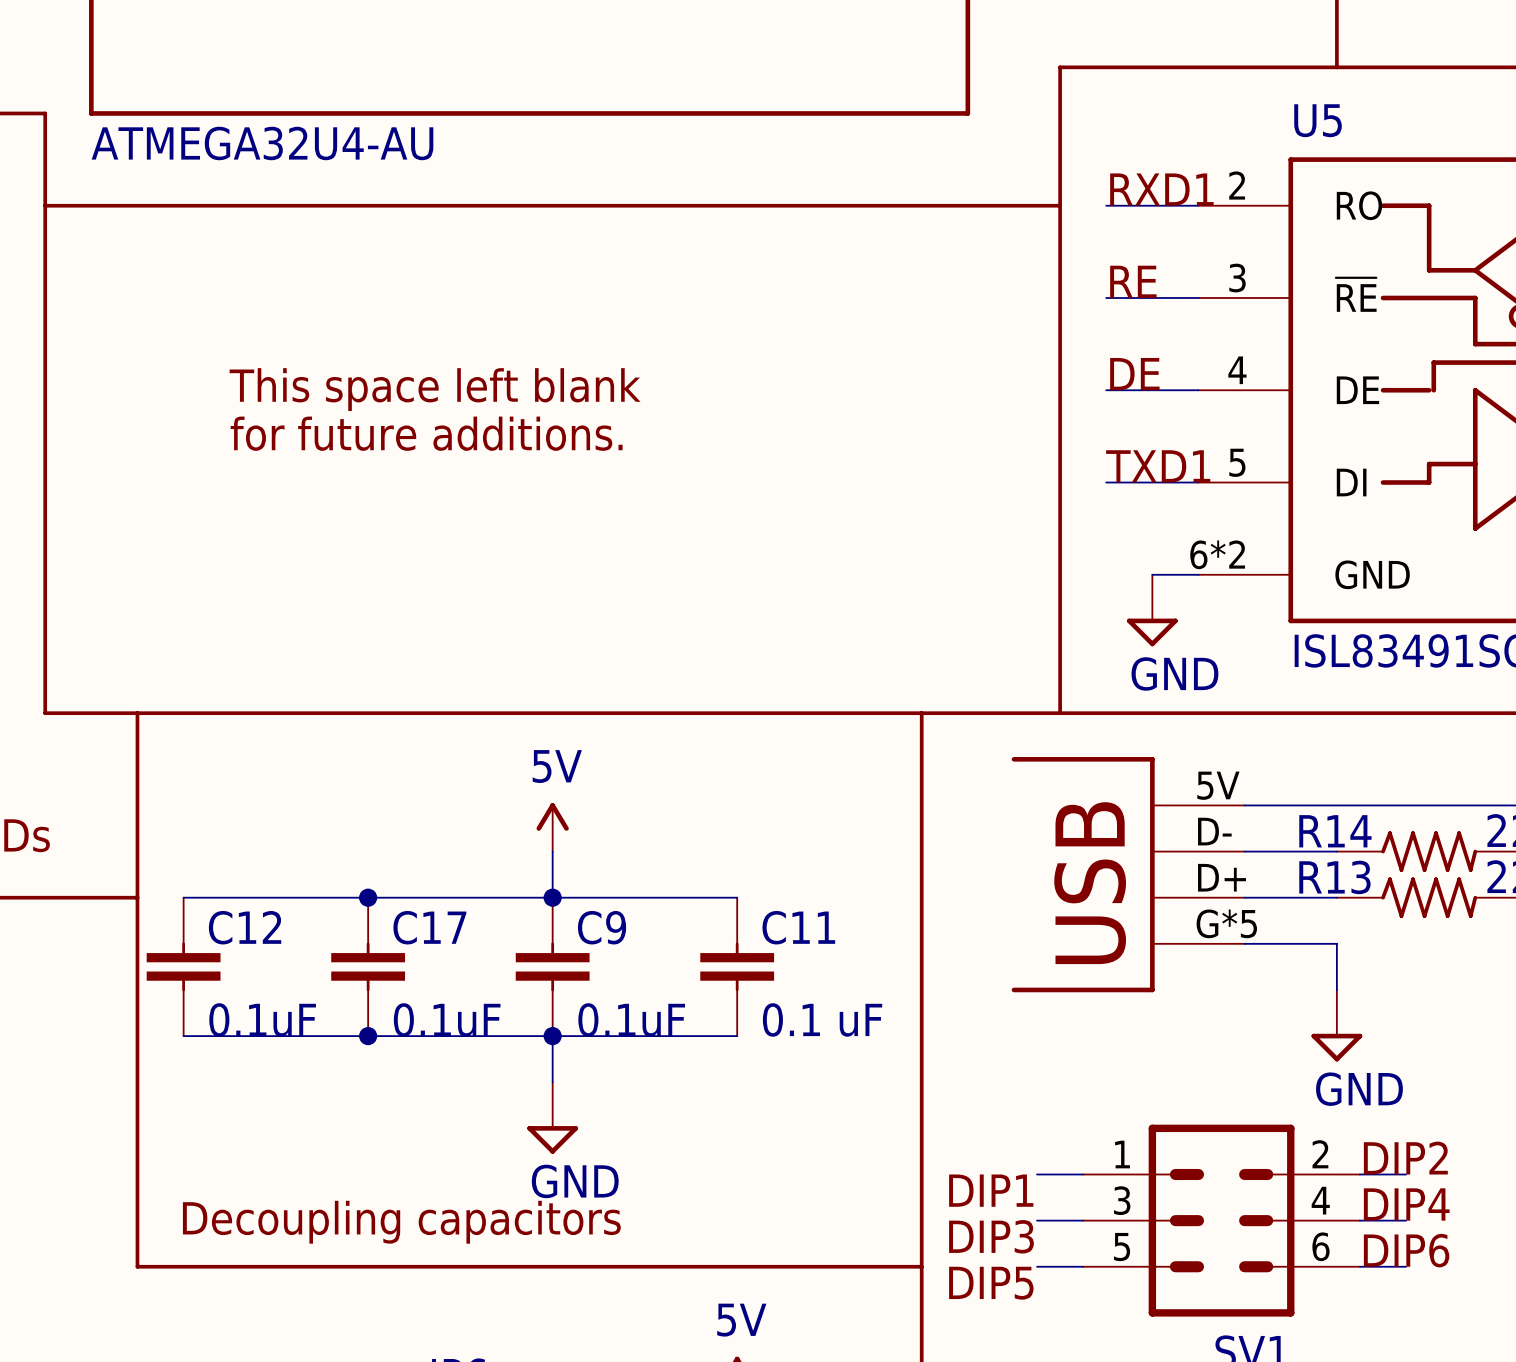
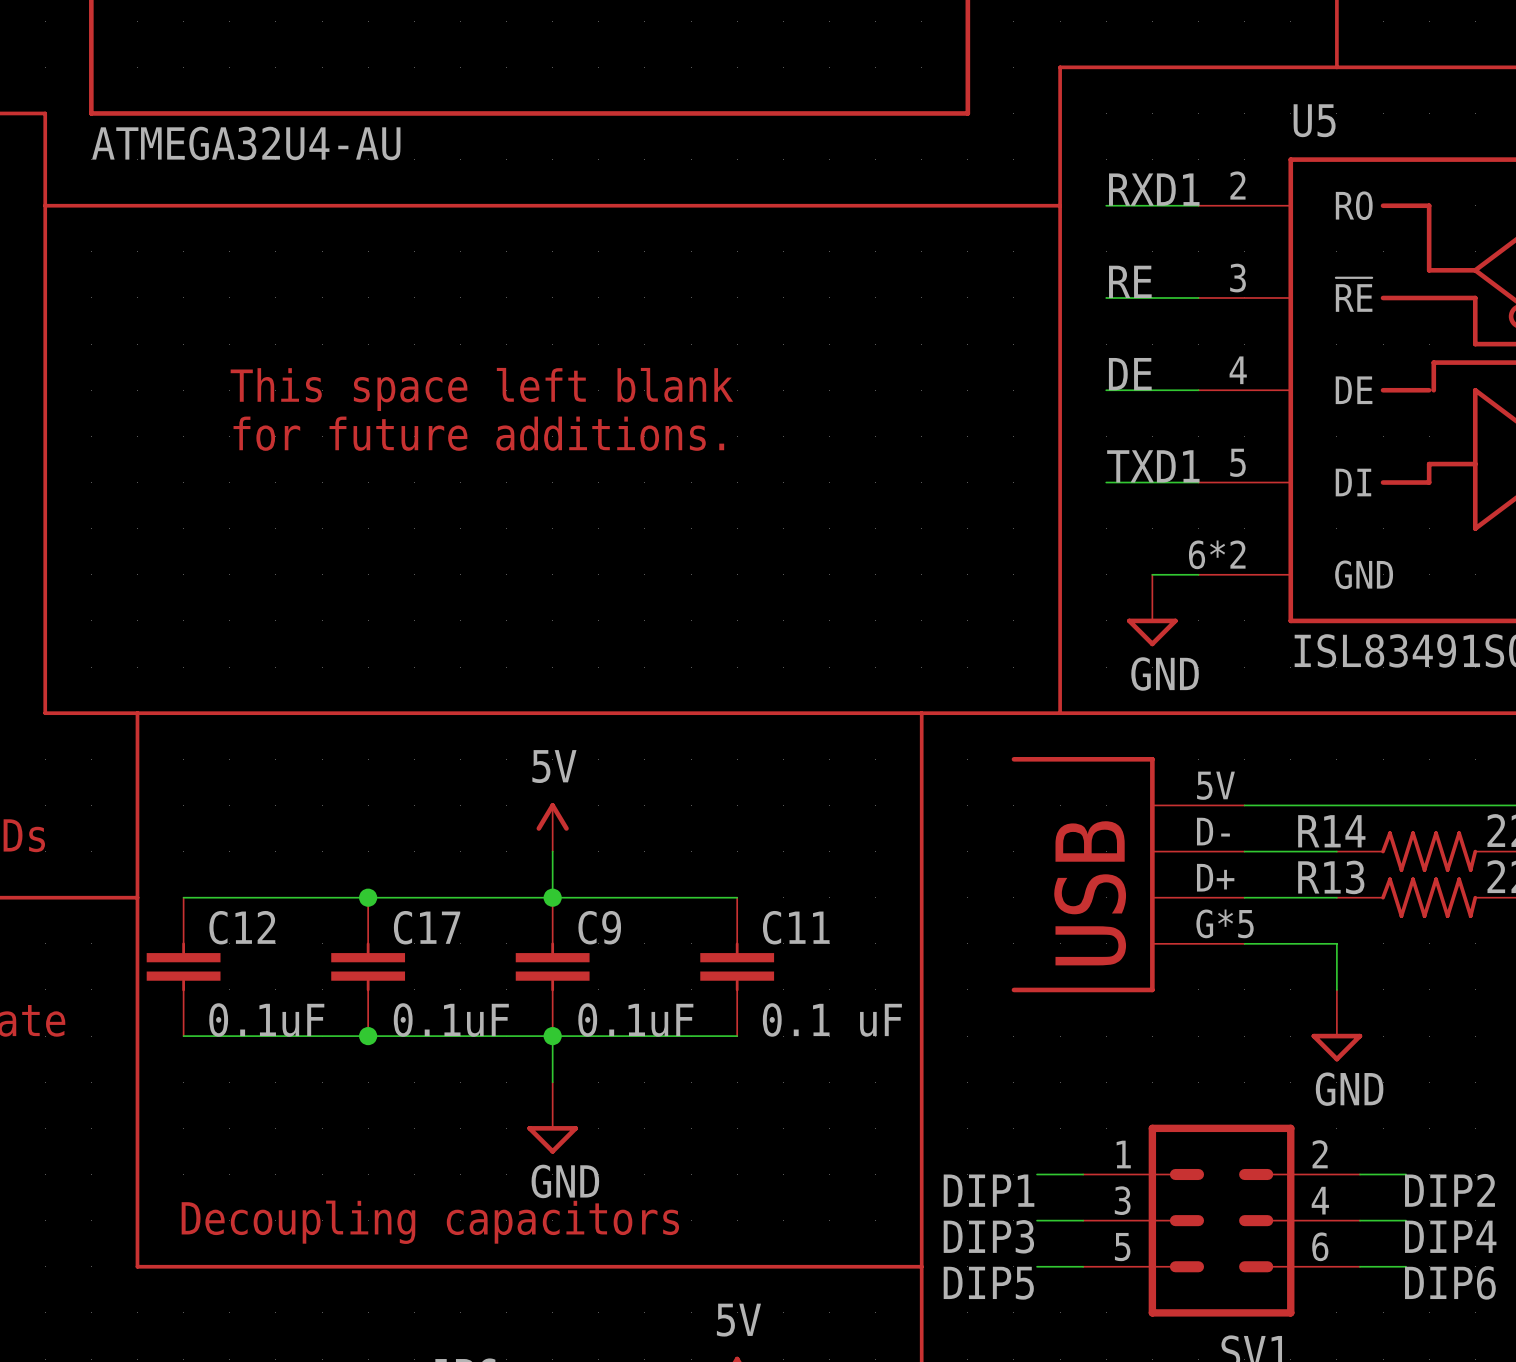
label position: DIP2 (1405, 1158) -> DIP2 (1449, 1190)
label position: DIP4 (1406, 1204) -> DIP4 (1450, 1236)
label position: DIP6 (1406, 1250) -> DIP6 (1450, 1282)

